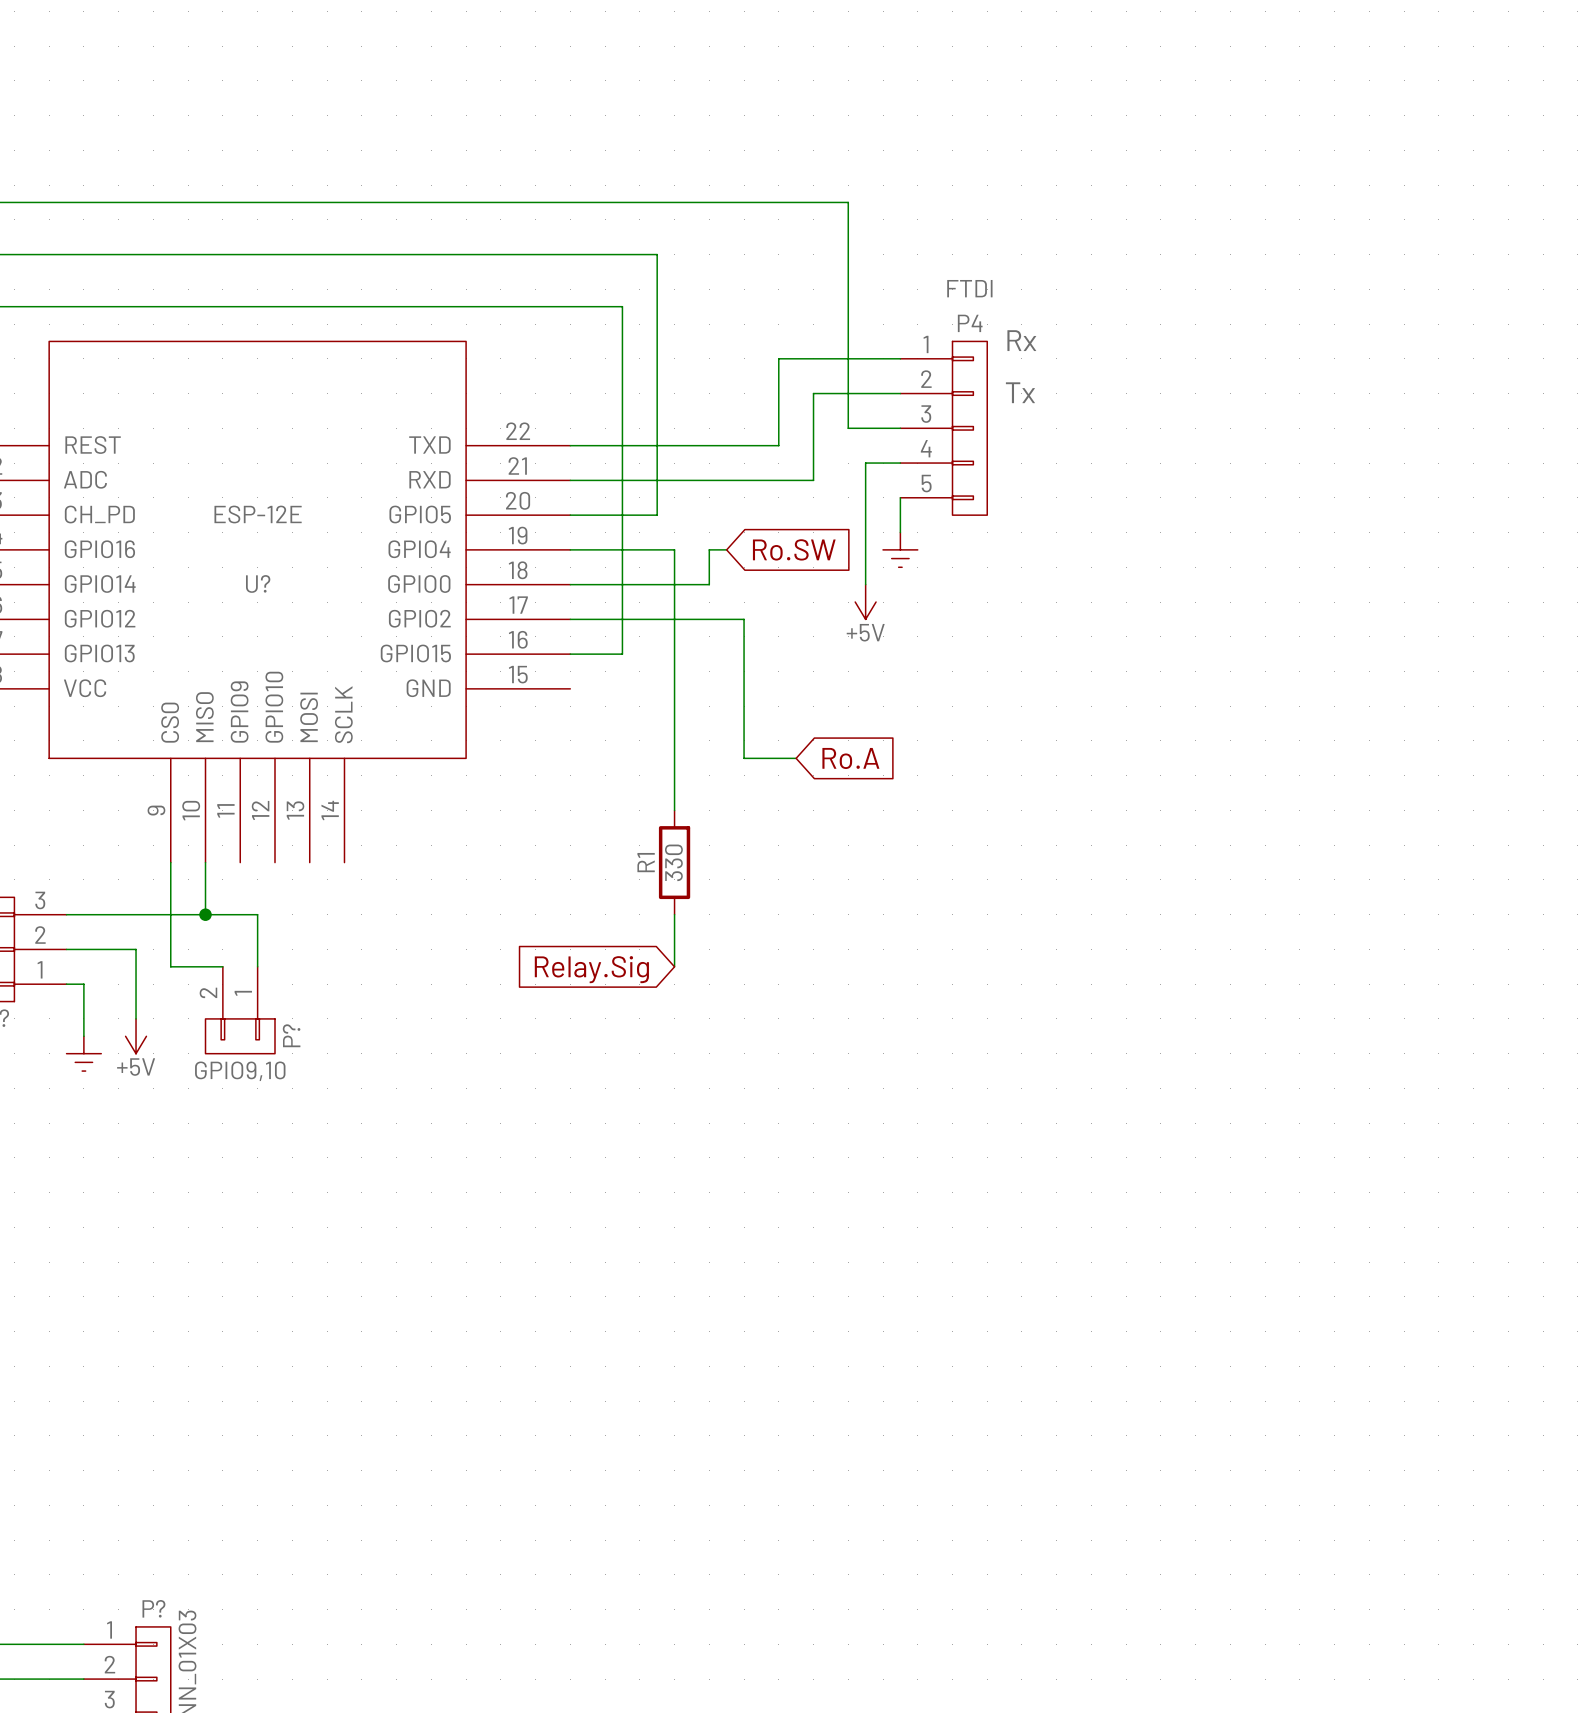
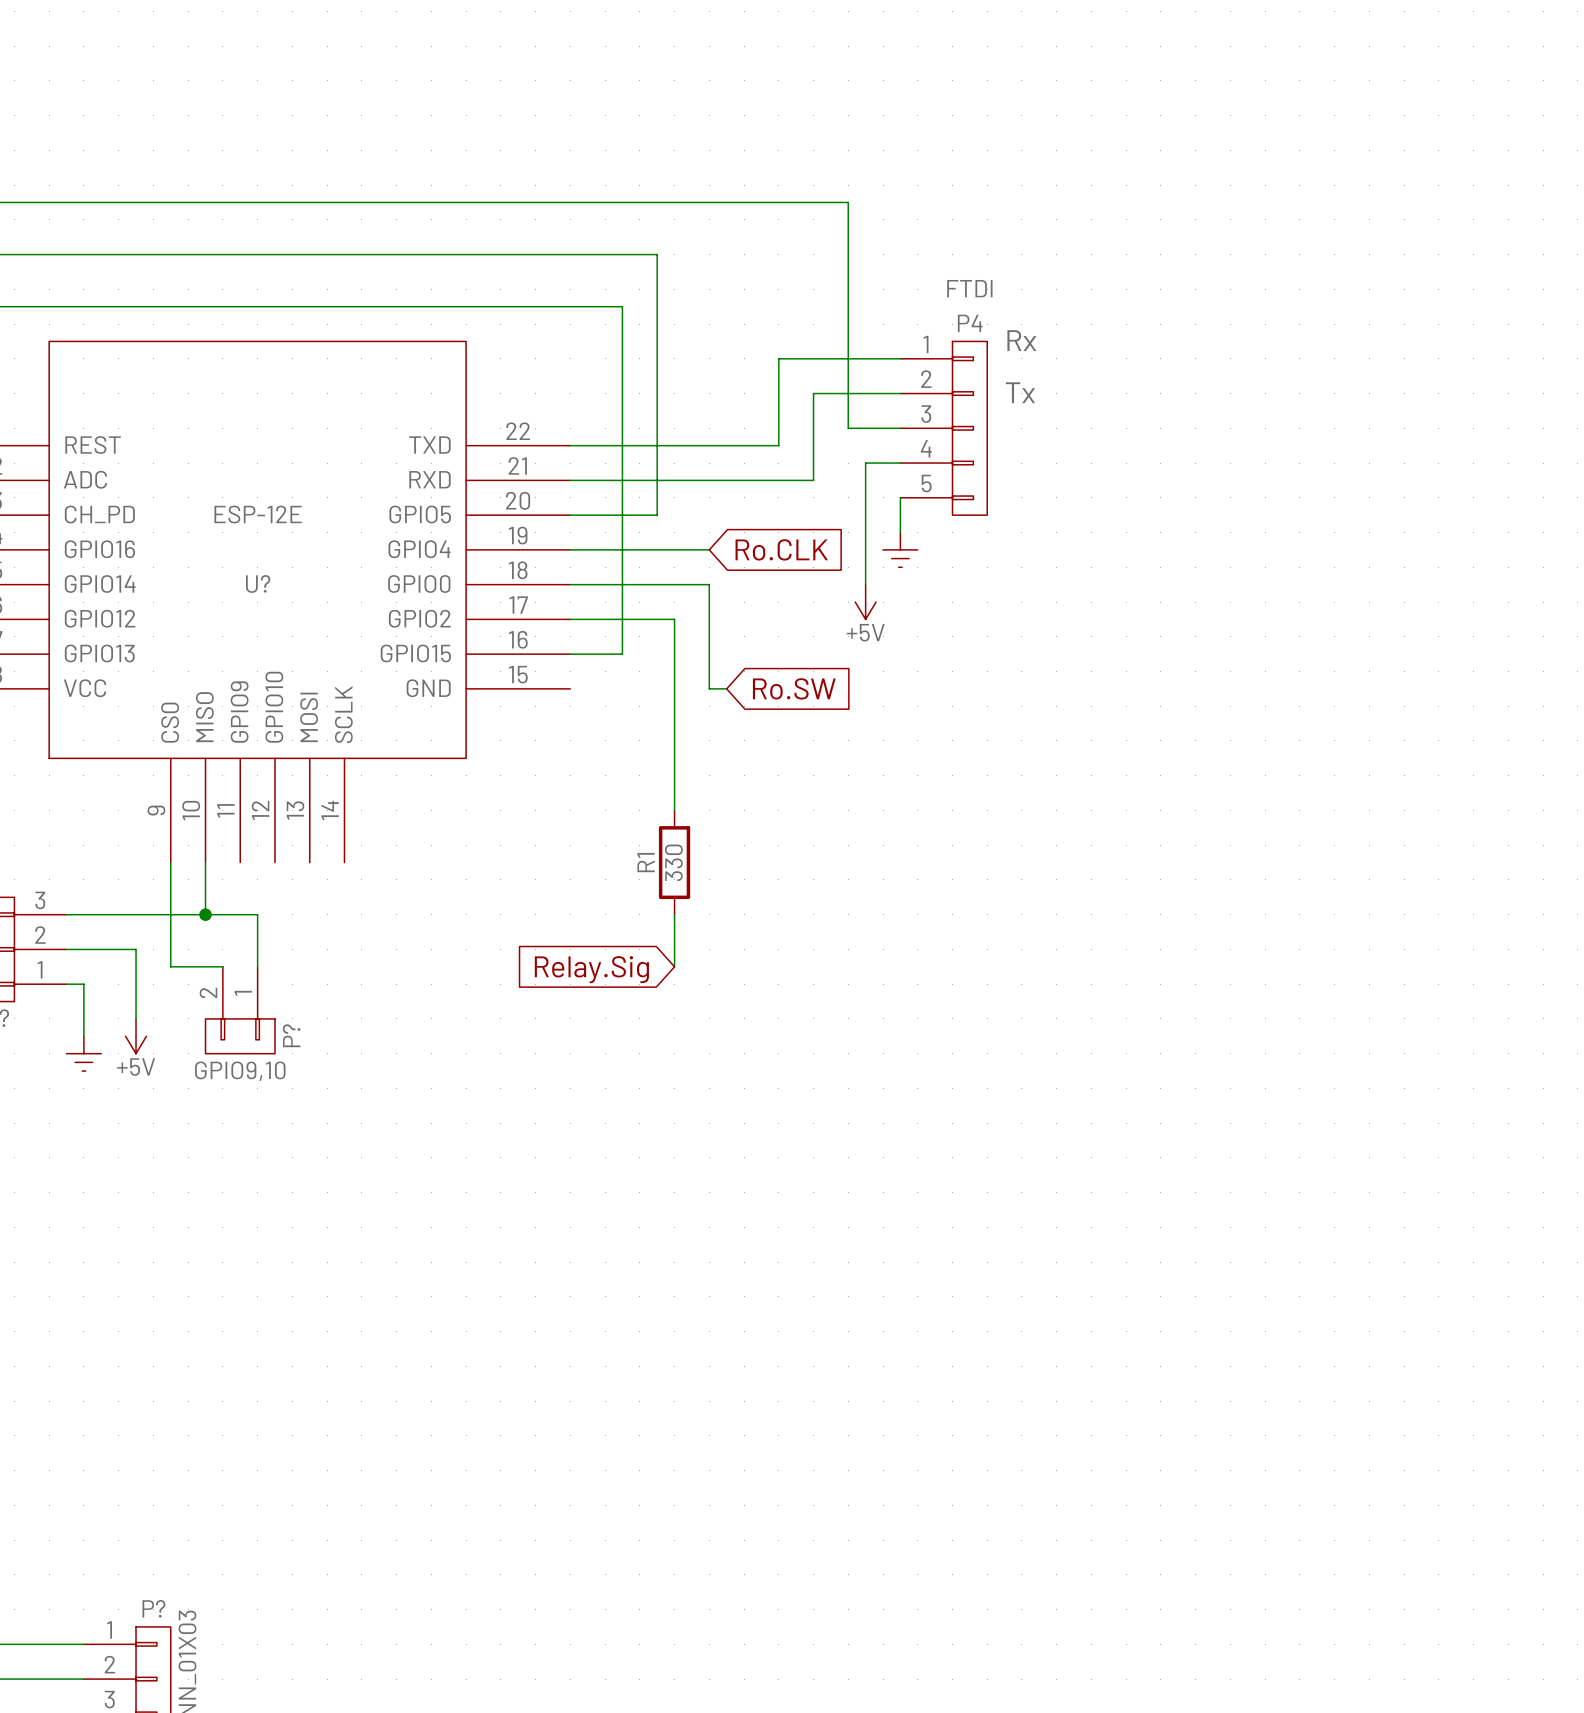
wire: (674, 549) (674, 619) (744, 619) (744, 758) (796, 758) -> (674, 549) (709, 549)
wire: (726, 549) (709, 549) (709, 584) -> (726, 688) (709, 688) (709, 584)
global label: none -> Ro.CLK (781, 549)
global label position: Ro.SW (794, 549) -> Ro.SW (794, 688)
global label: Ro.A (850, 758) -> none

